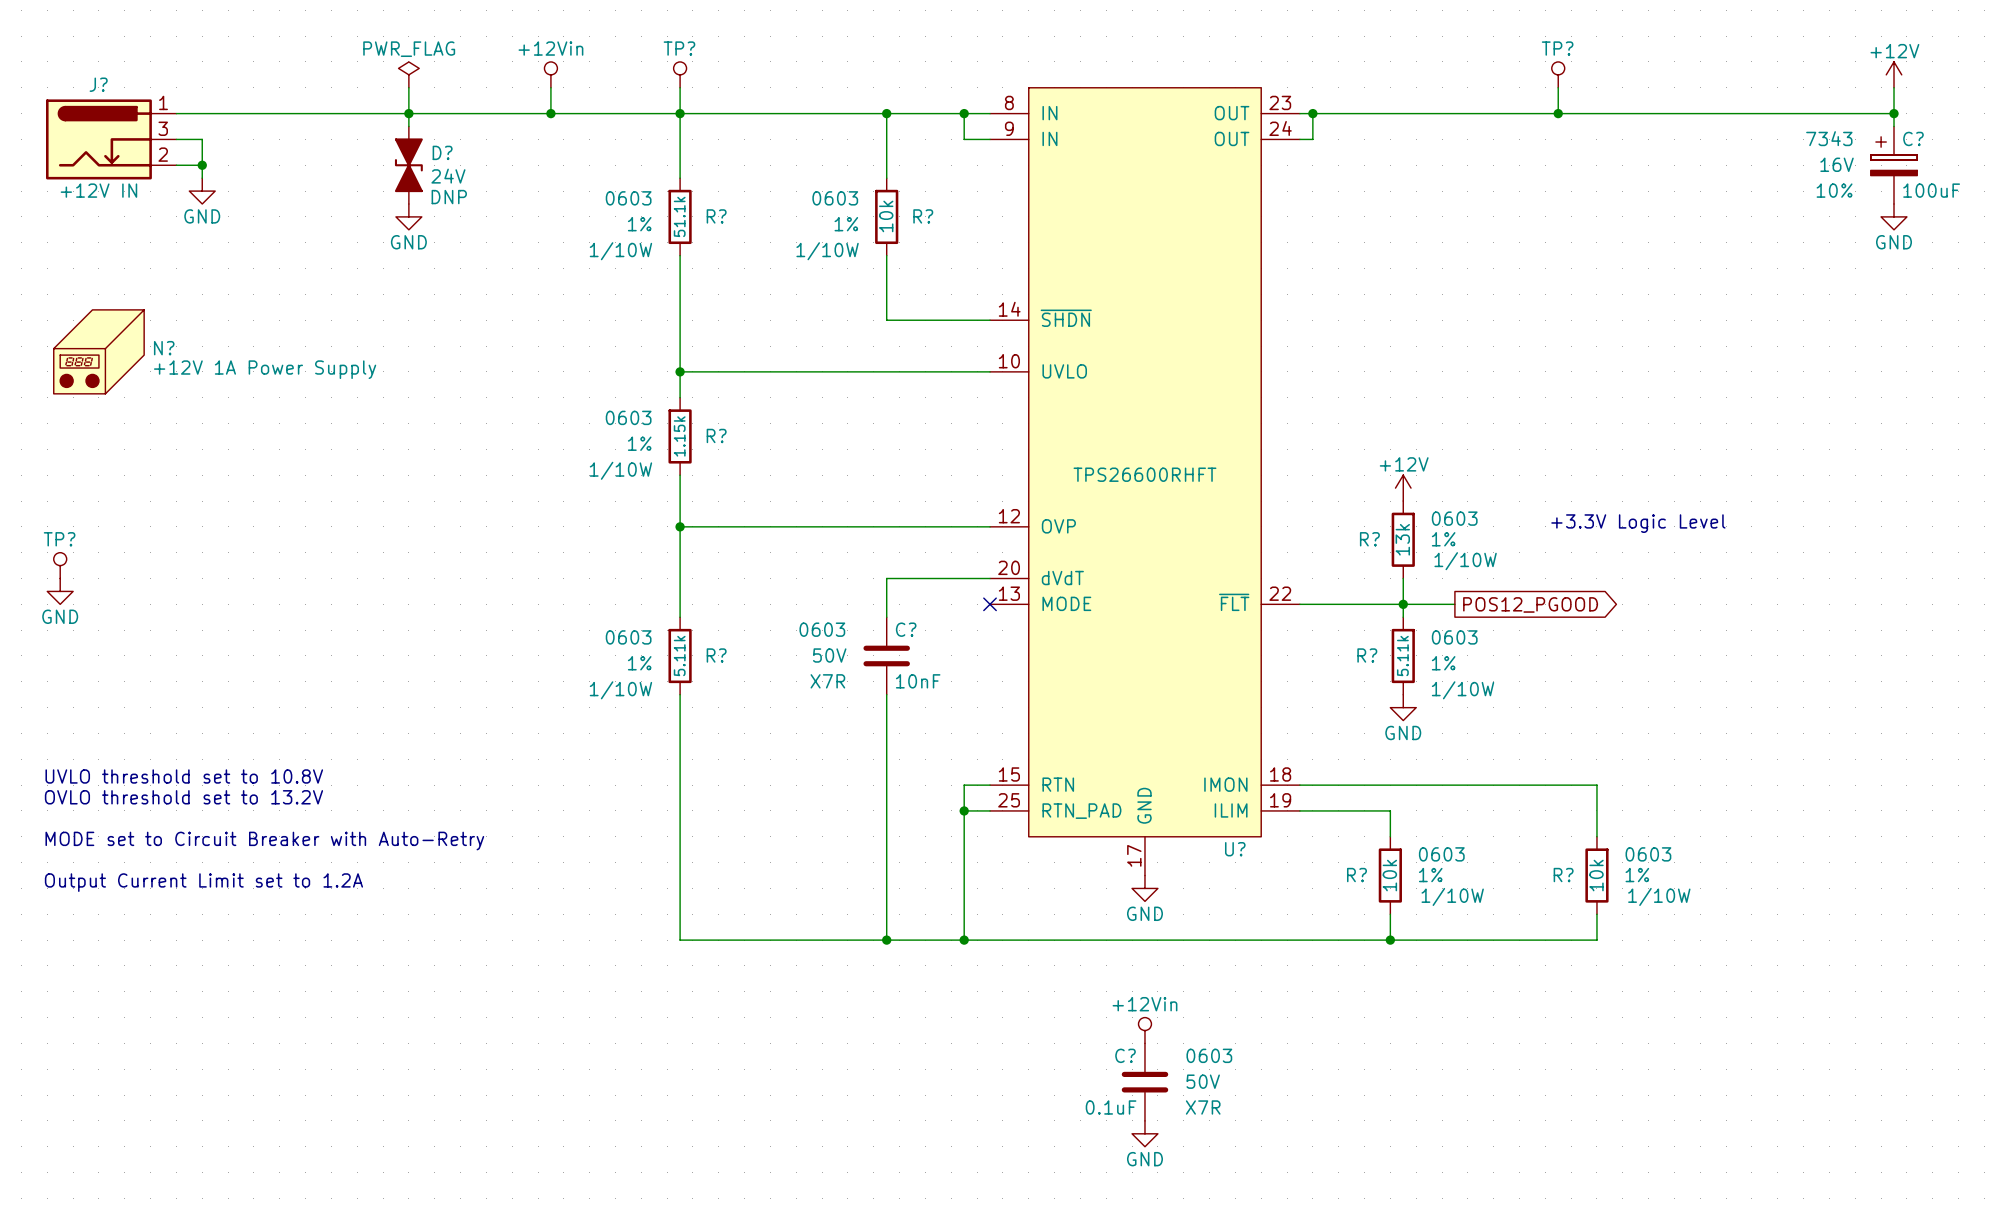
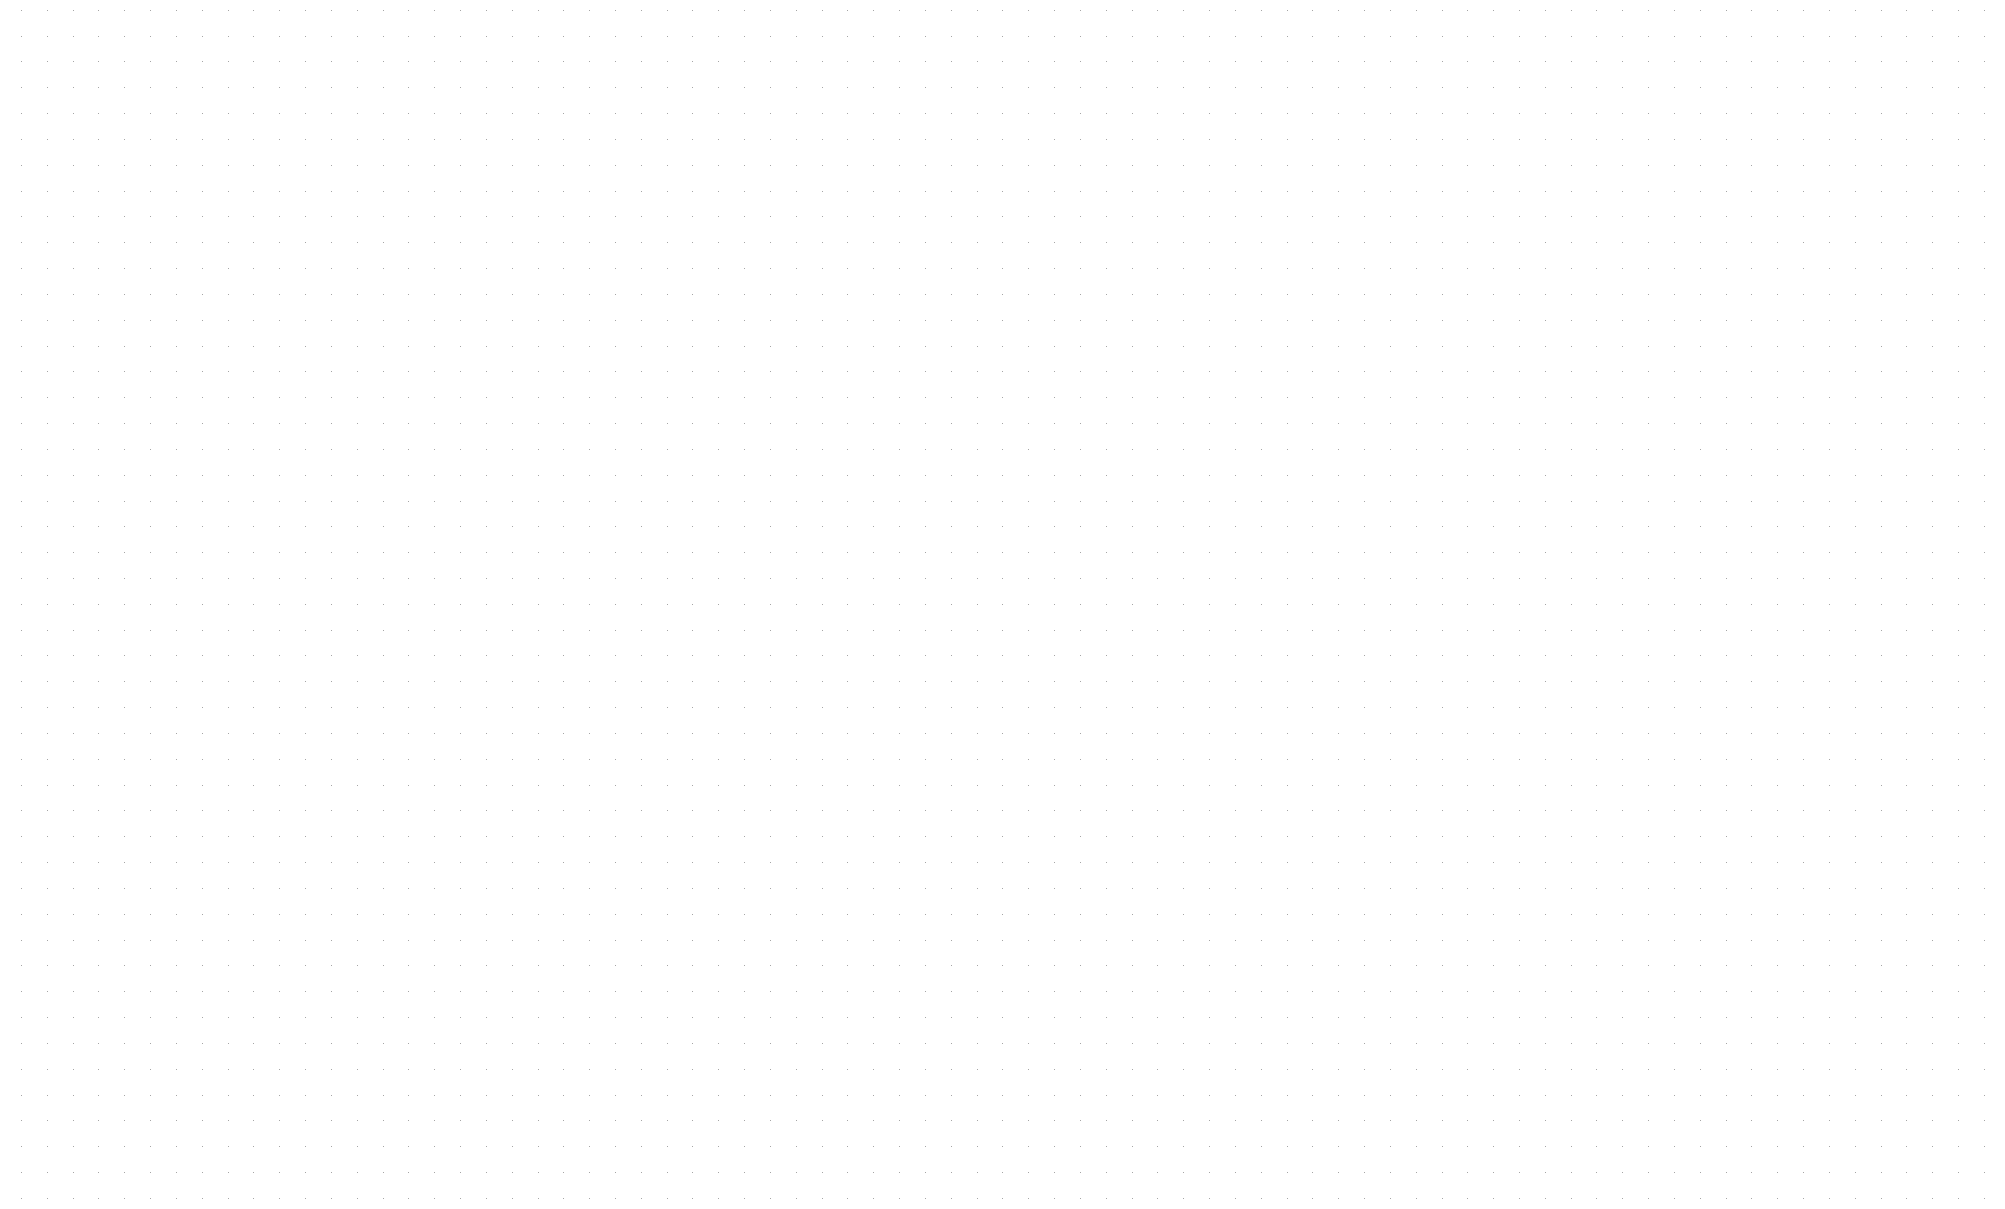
power symbol: PWR_FLAG (408, 74) -> none
power symbol: +12Vin (550, 74) -> none
TP?: (680, 74) -> none
TP?: (1558, 74) -> none
power symbol: +12V (1894, 74) -> none
wire: (408, 87) (408, 126) -> none
wire: (550, 87) (550, 113) -> none
wire: (680, 87) (680, 178) -> none
wire: (1558, 87) (1558, 113) -> none
wire: (1894, 87) (1894, 126) -> none
wire: (176, 113) (990, 113) -> none
junction: (408, 113) -> none
junction: (550, 113) -> none
junction: (680, 113) -> none
wire: (886, 113) (886, 178) -> none
junction: (886, 113) -> none
wire: (964, 113) (964, 139) (990, 139) -> none
junction: (964, 113) -> none
wire: (1299, 113) (1894, 113) -> none
wire: (1312, 113) (1312, 139) (1299, 139) -> none
junction: (1312, 113) -> none
junction: (1558, 113) -> none
junction: (1894, 113) -> none
J?: +12V IN (111, 139) -> none
wire: (176, 139) (202, 139) (202, 178) -> none
wire: (176, 165) (202, 165) -> none
junction: (202, 165) -> none
D?: 24V (408, 165) -> none
C?: 100uF (1894, 165) -> none
power symbol: GND (202, 191) -> none
power symbol: GND (408, 216) -> none
R?: 51.1k (680, 216) -> none
R?: 10k (886, 216) -> none
power symbol: GND (1894, 216) -> none
wire: (680, 255) (680, 397) -> none
wire: (886, 255) (886, 320) (990, 320) -> none
N?: +12V 1A Power Supply (98, 351) -> none
wire: (680, 371) (990, 371) -> none
junction: (680, 371) -> none
R?: 1.15k (680, 436) -> none
wire: (680, 475) (680, 617) -> none
U?: TPS26600RHFT (1144, 481) -> none
power symbol: +12V (1403, 488) -> none
text: +3.3V Logic Level (1638, 523) -> none
wire: (680, 526) (990, 526) -> none
junction: (680, 526) -> none
R?: 13k (1403, 539) -> none
TP?: (60, 565) -> none
wire: (990, 578) (886, 578) (886, 617) -> none
wire: (1403, 578) (1403, 617) -> none
power symbol: GND (60, 591) -> none
no-connect mark: (990, 604) -> none
wire: (1299, 604) (1454, 604) -> none
junction: (1403, 604) -> none
global label: POS12_PGOOD (1530, 604) -> none
R?: 5.11k (680, 655) -> none
C?: 10nF (886, 655) -> none
R?: 5.11k (1403, 655) -> none
wire: (680, 694) (680, 940) (1596, 940) (1596, 914) -> none
wire: (886, 694) (886, 940) -> none
power symbol: GND (1403, 707) -> none
text: UVLO threshold set to 10.8V (184, 776) -> none
wire: (990, 785) (964, 785) (964, 940) -> none
wire: (1299, 785) (1596, 785) (1596, 836) -> none
text: OVLO threshold set to 13.2V (183, 797) -> none
wire: (964, 810) (990, 810) -> none
junction: (964, 810) -> none
wire: (1299, 810) (1390, 810) (1390, 836) -> none
text: MODE set to Circuit Breaker with Auto-Retry (264, 841) -> none
R?: 10k (1390, 875) -> none
R?: 10k (1596, 875) -> none
text: Output Current Limit set to 1.2A (203, 882) -> none
power symbol: GND (1144, 888) -> none
wire: (1390, 914) (1390, 940) -> none
junction: (886, 940) -> none
junction: (964, 940) -> none
junction: (1390, 940) -> none
power symbol: +12Vin (1144, 1030) -> none
C?: 0.1uF (1144, 1082) -> none
power symbol: GND (1144, 1133) -> none

